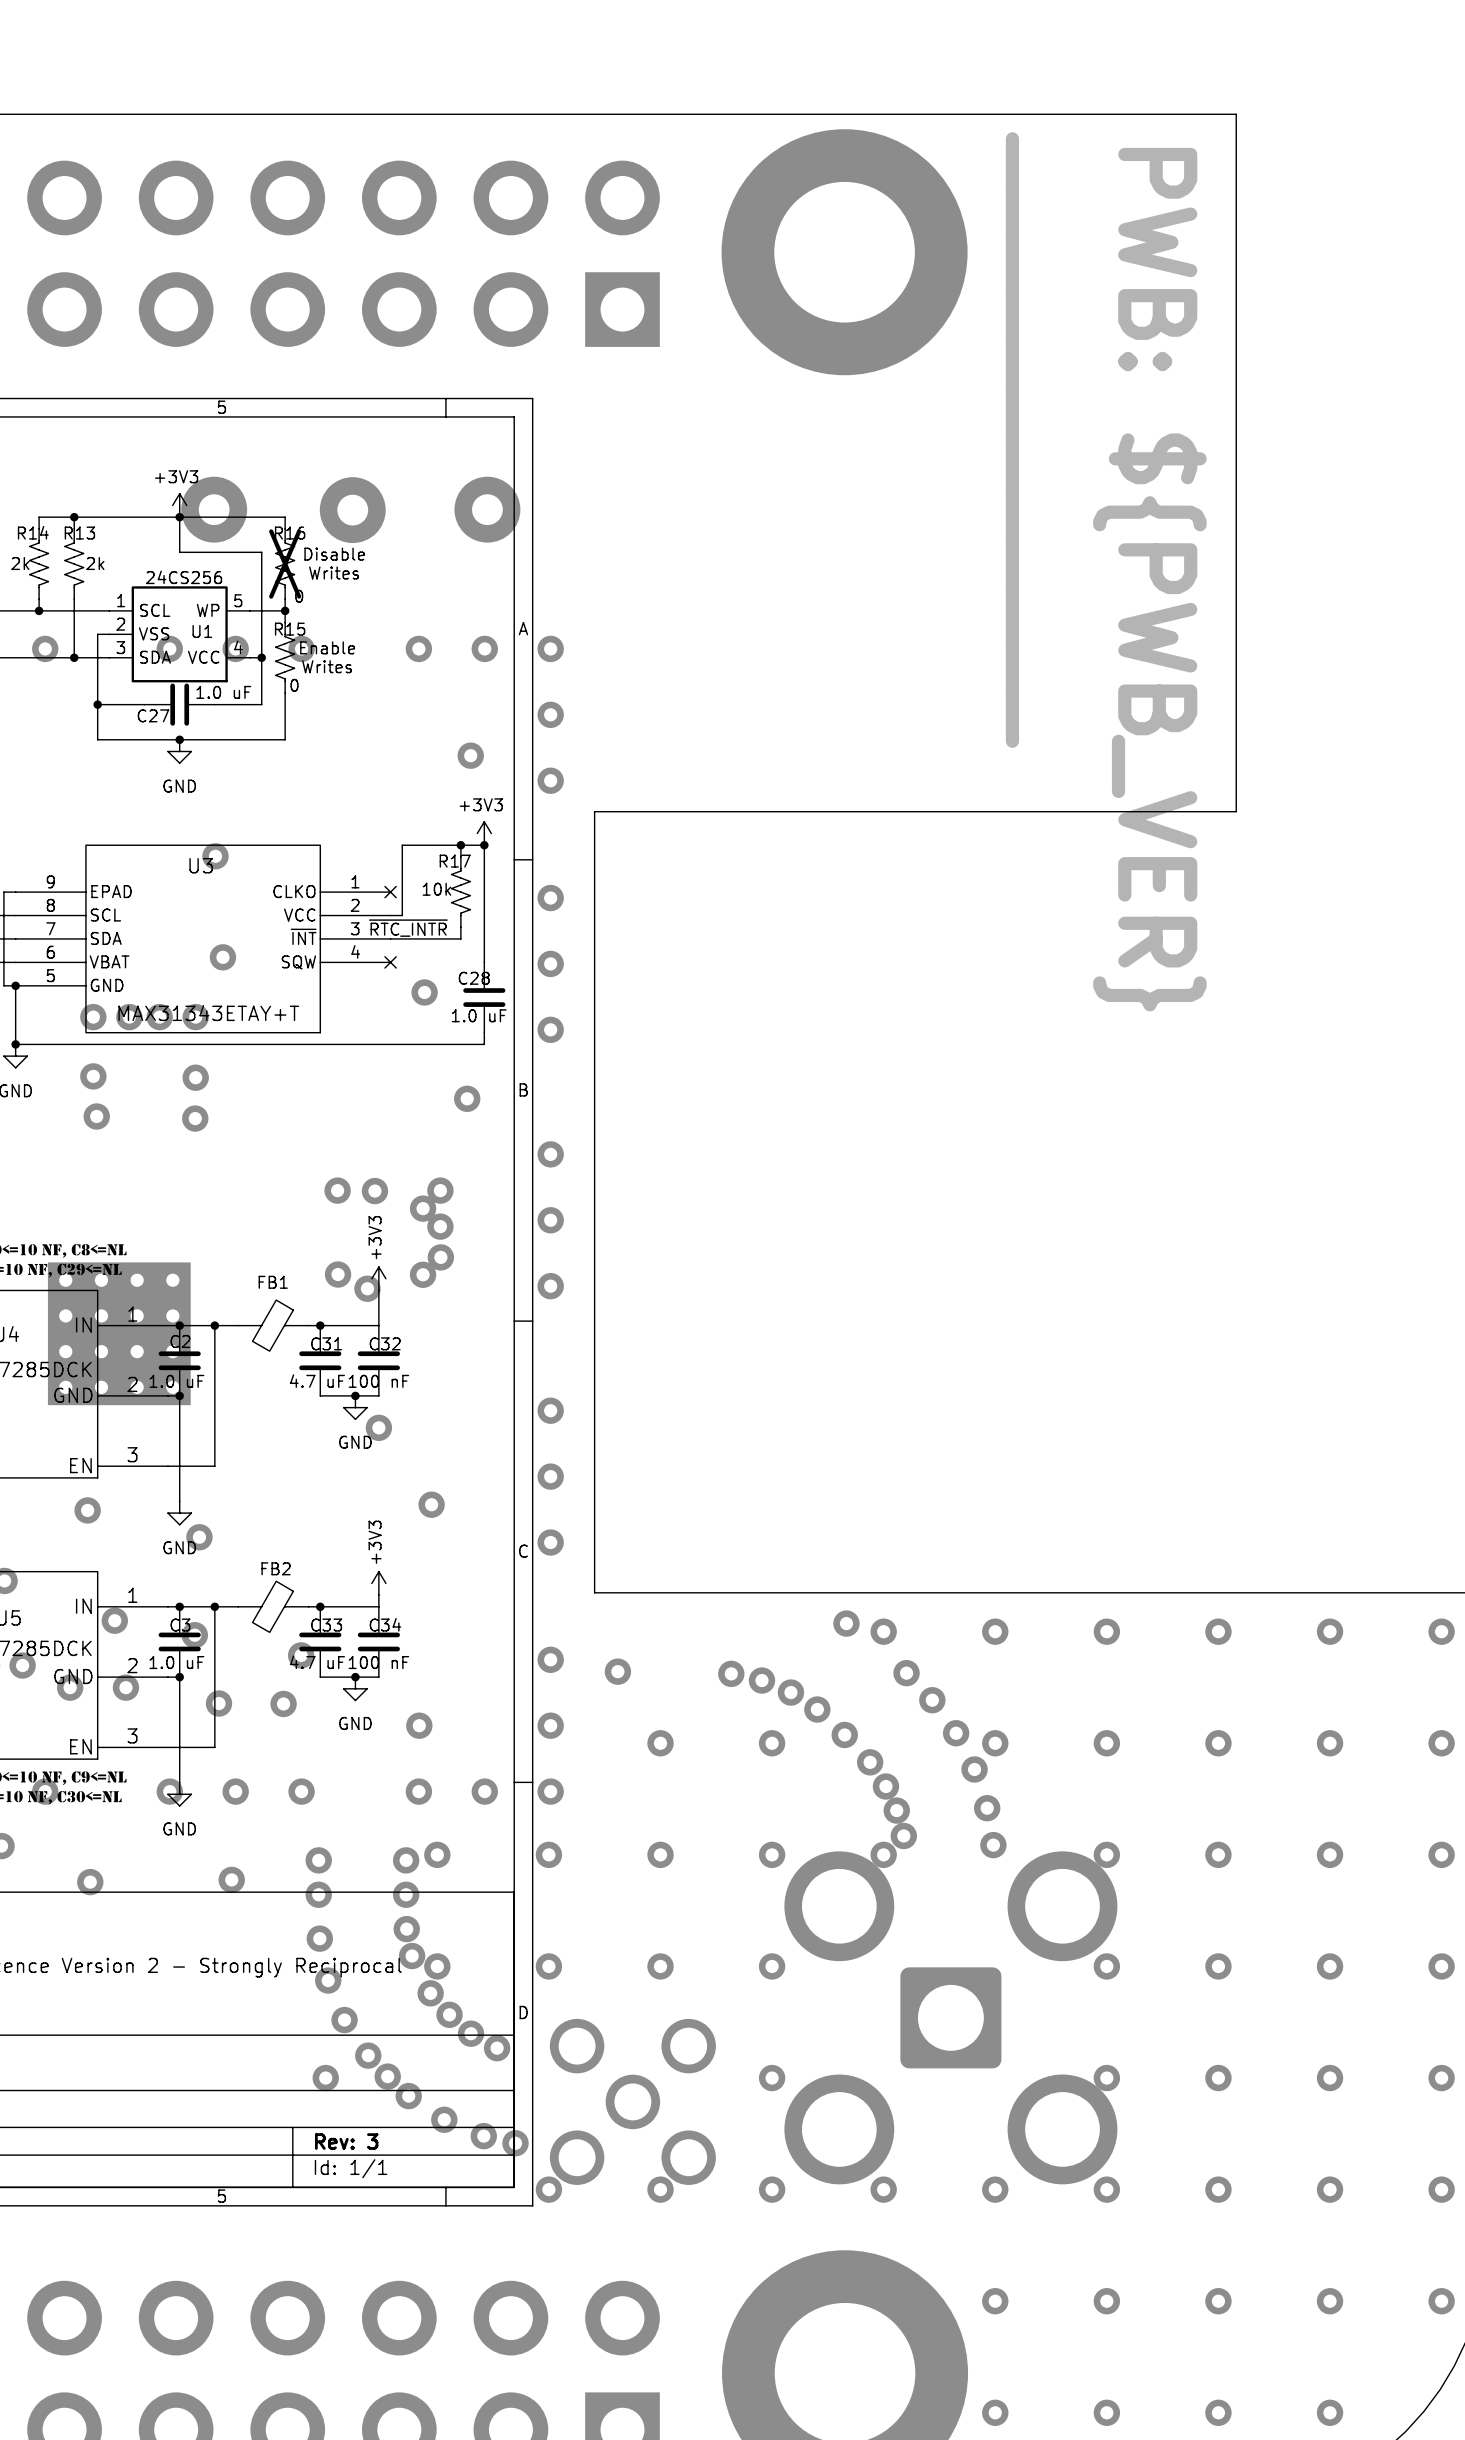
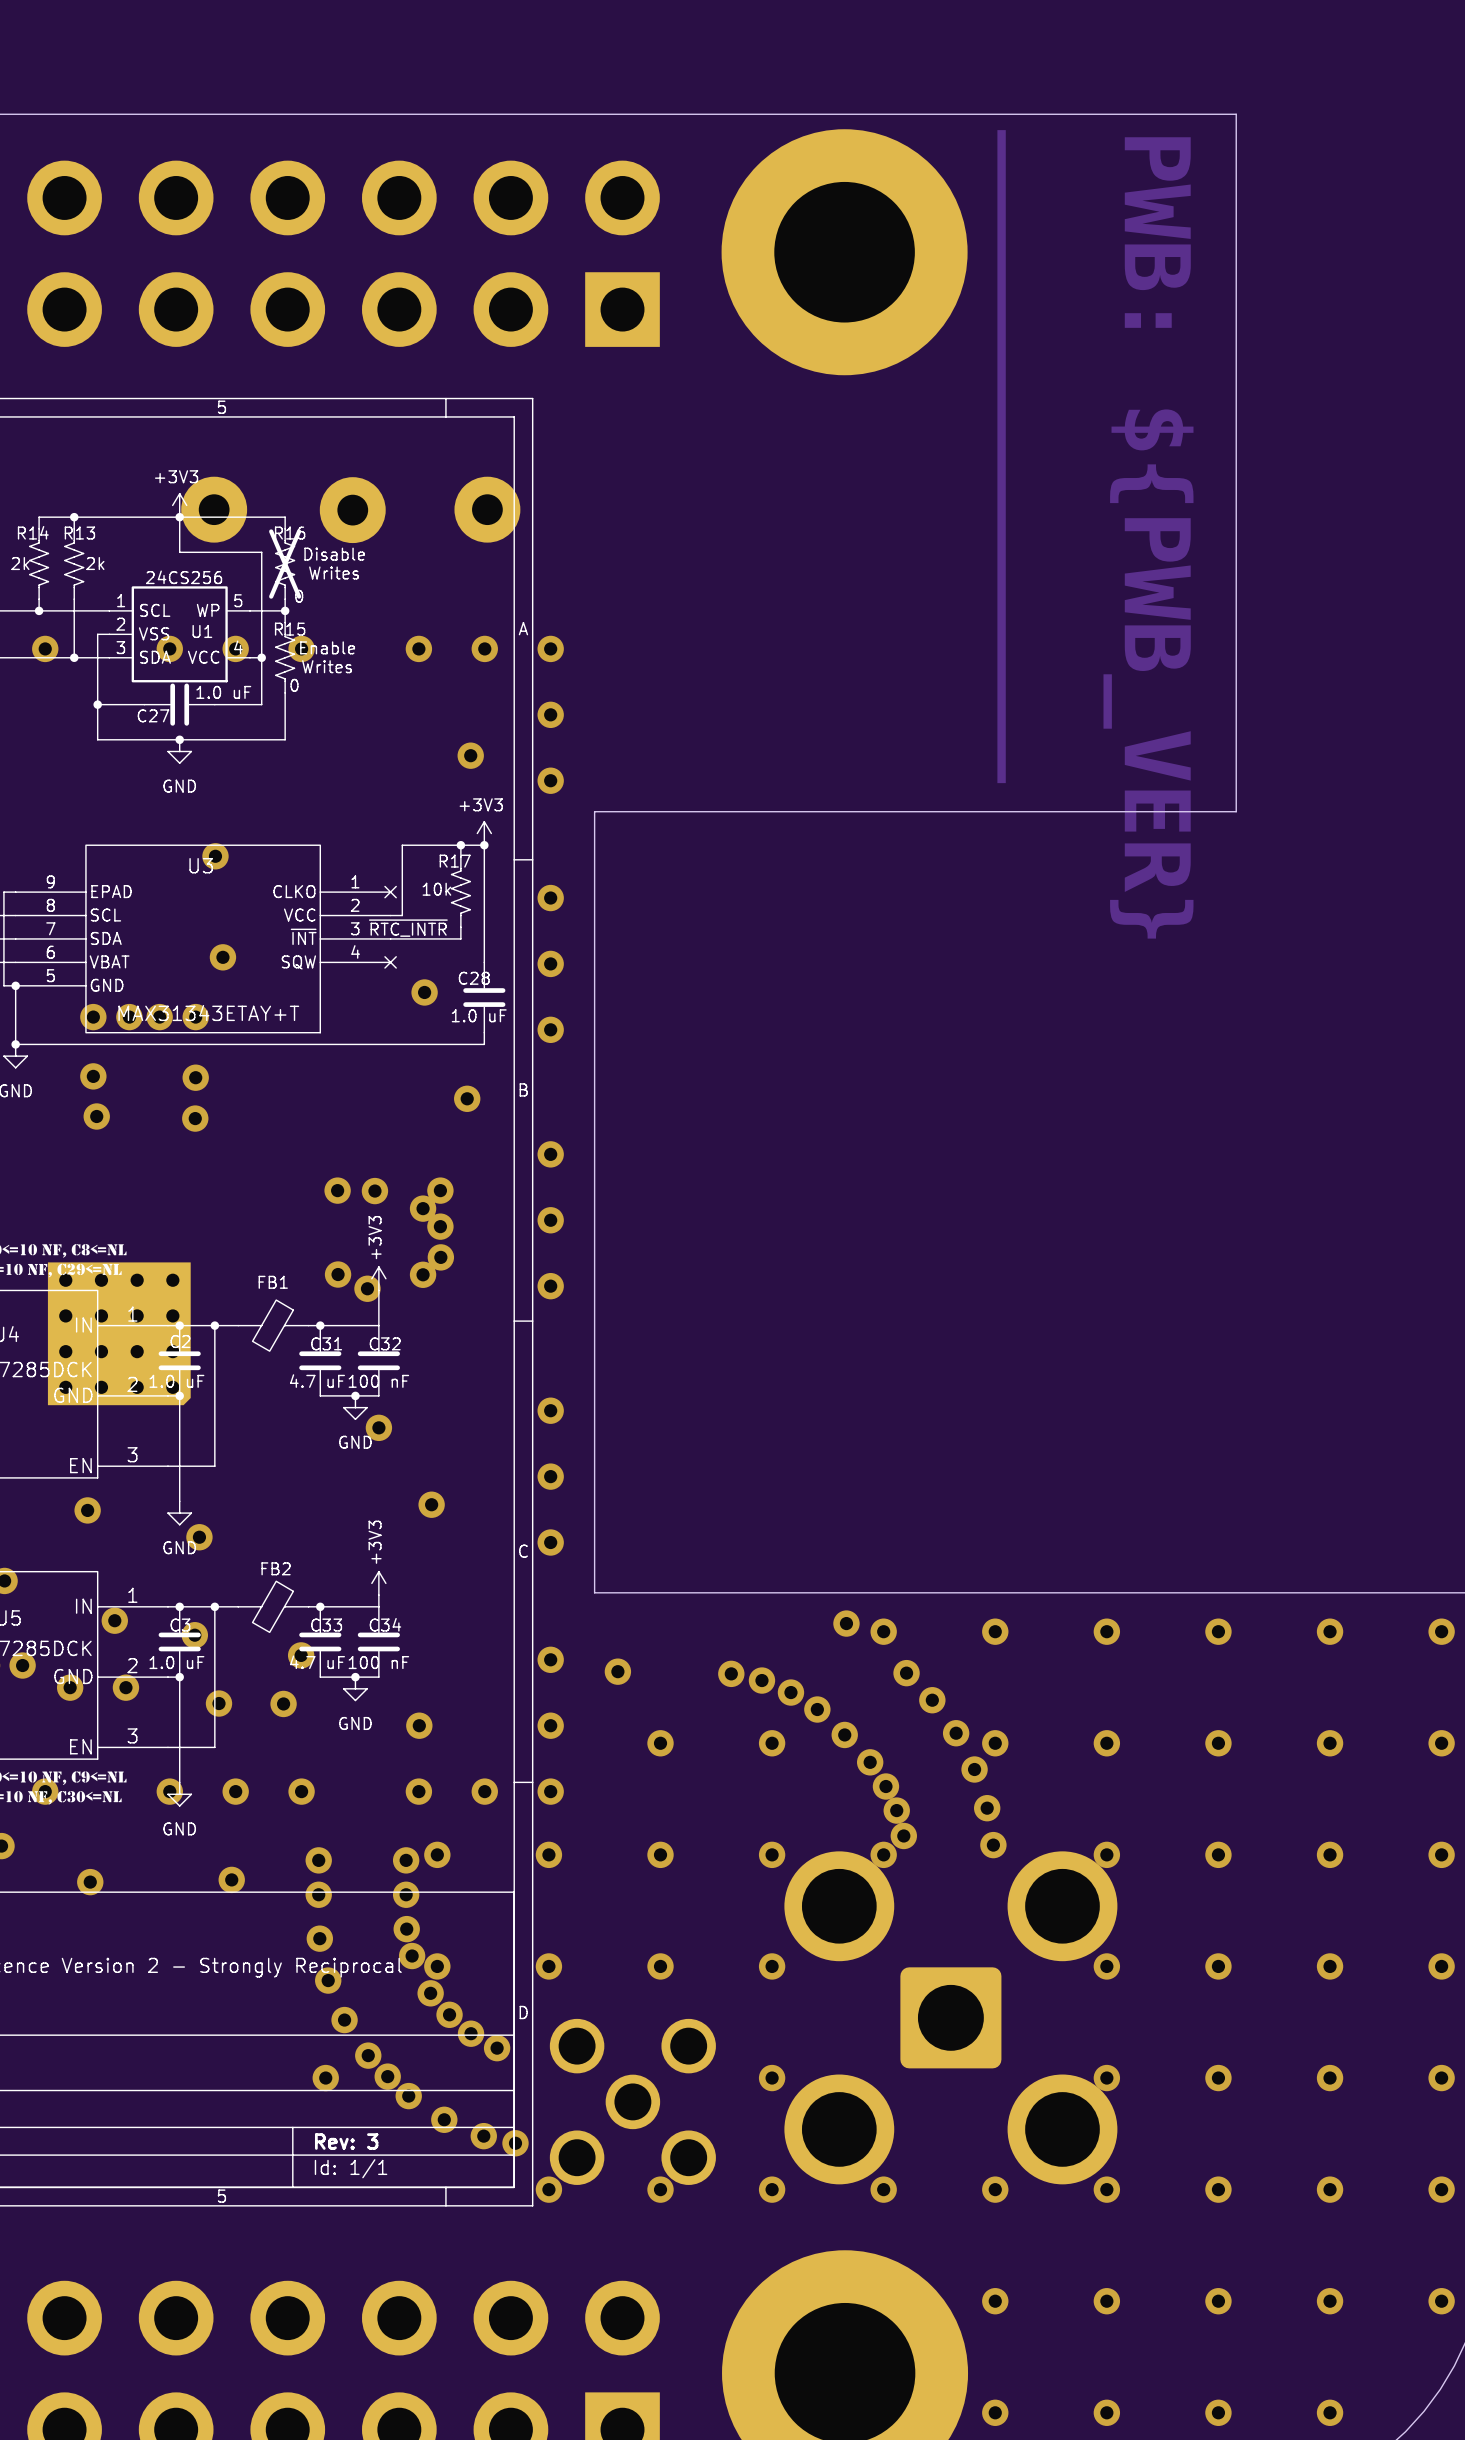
part footprint: [47, 1262, 191, 1406] -> [47, 1262, 191, 1406]

